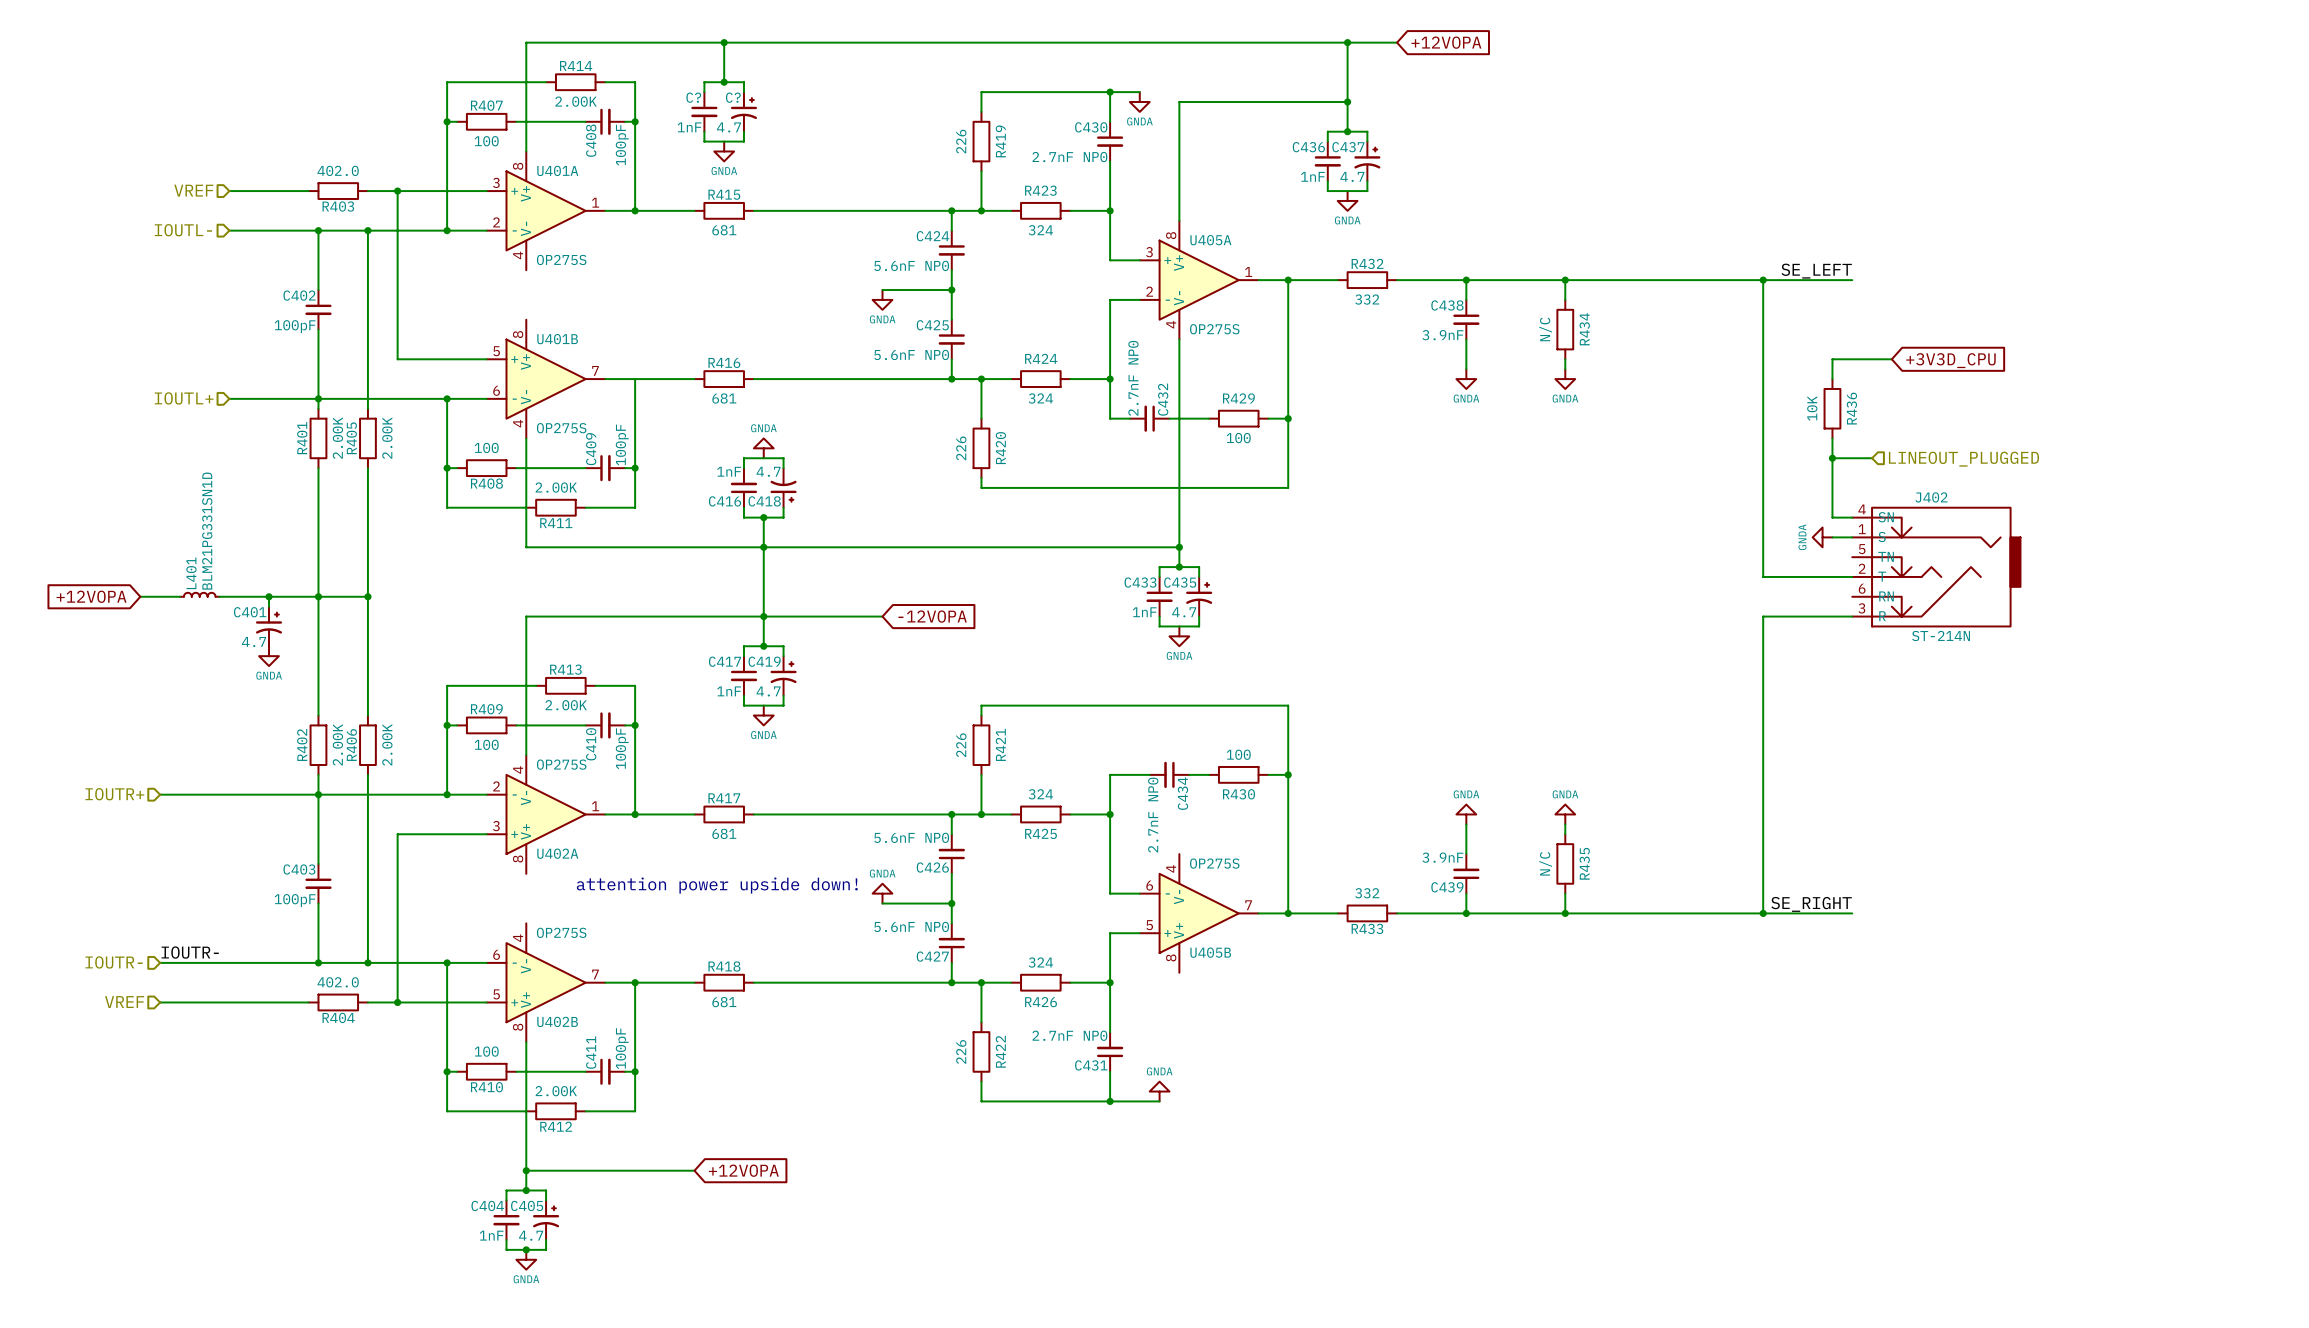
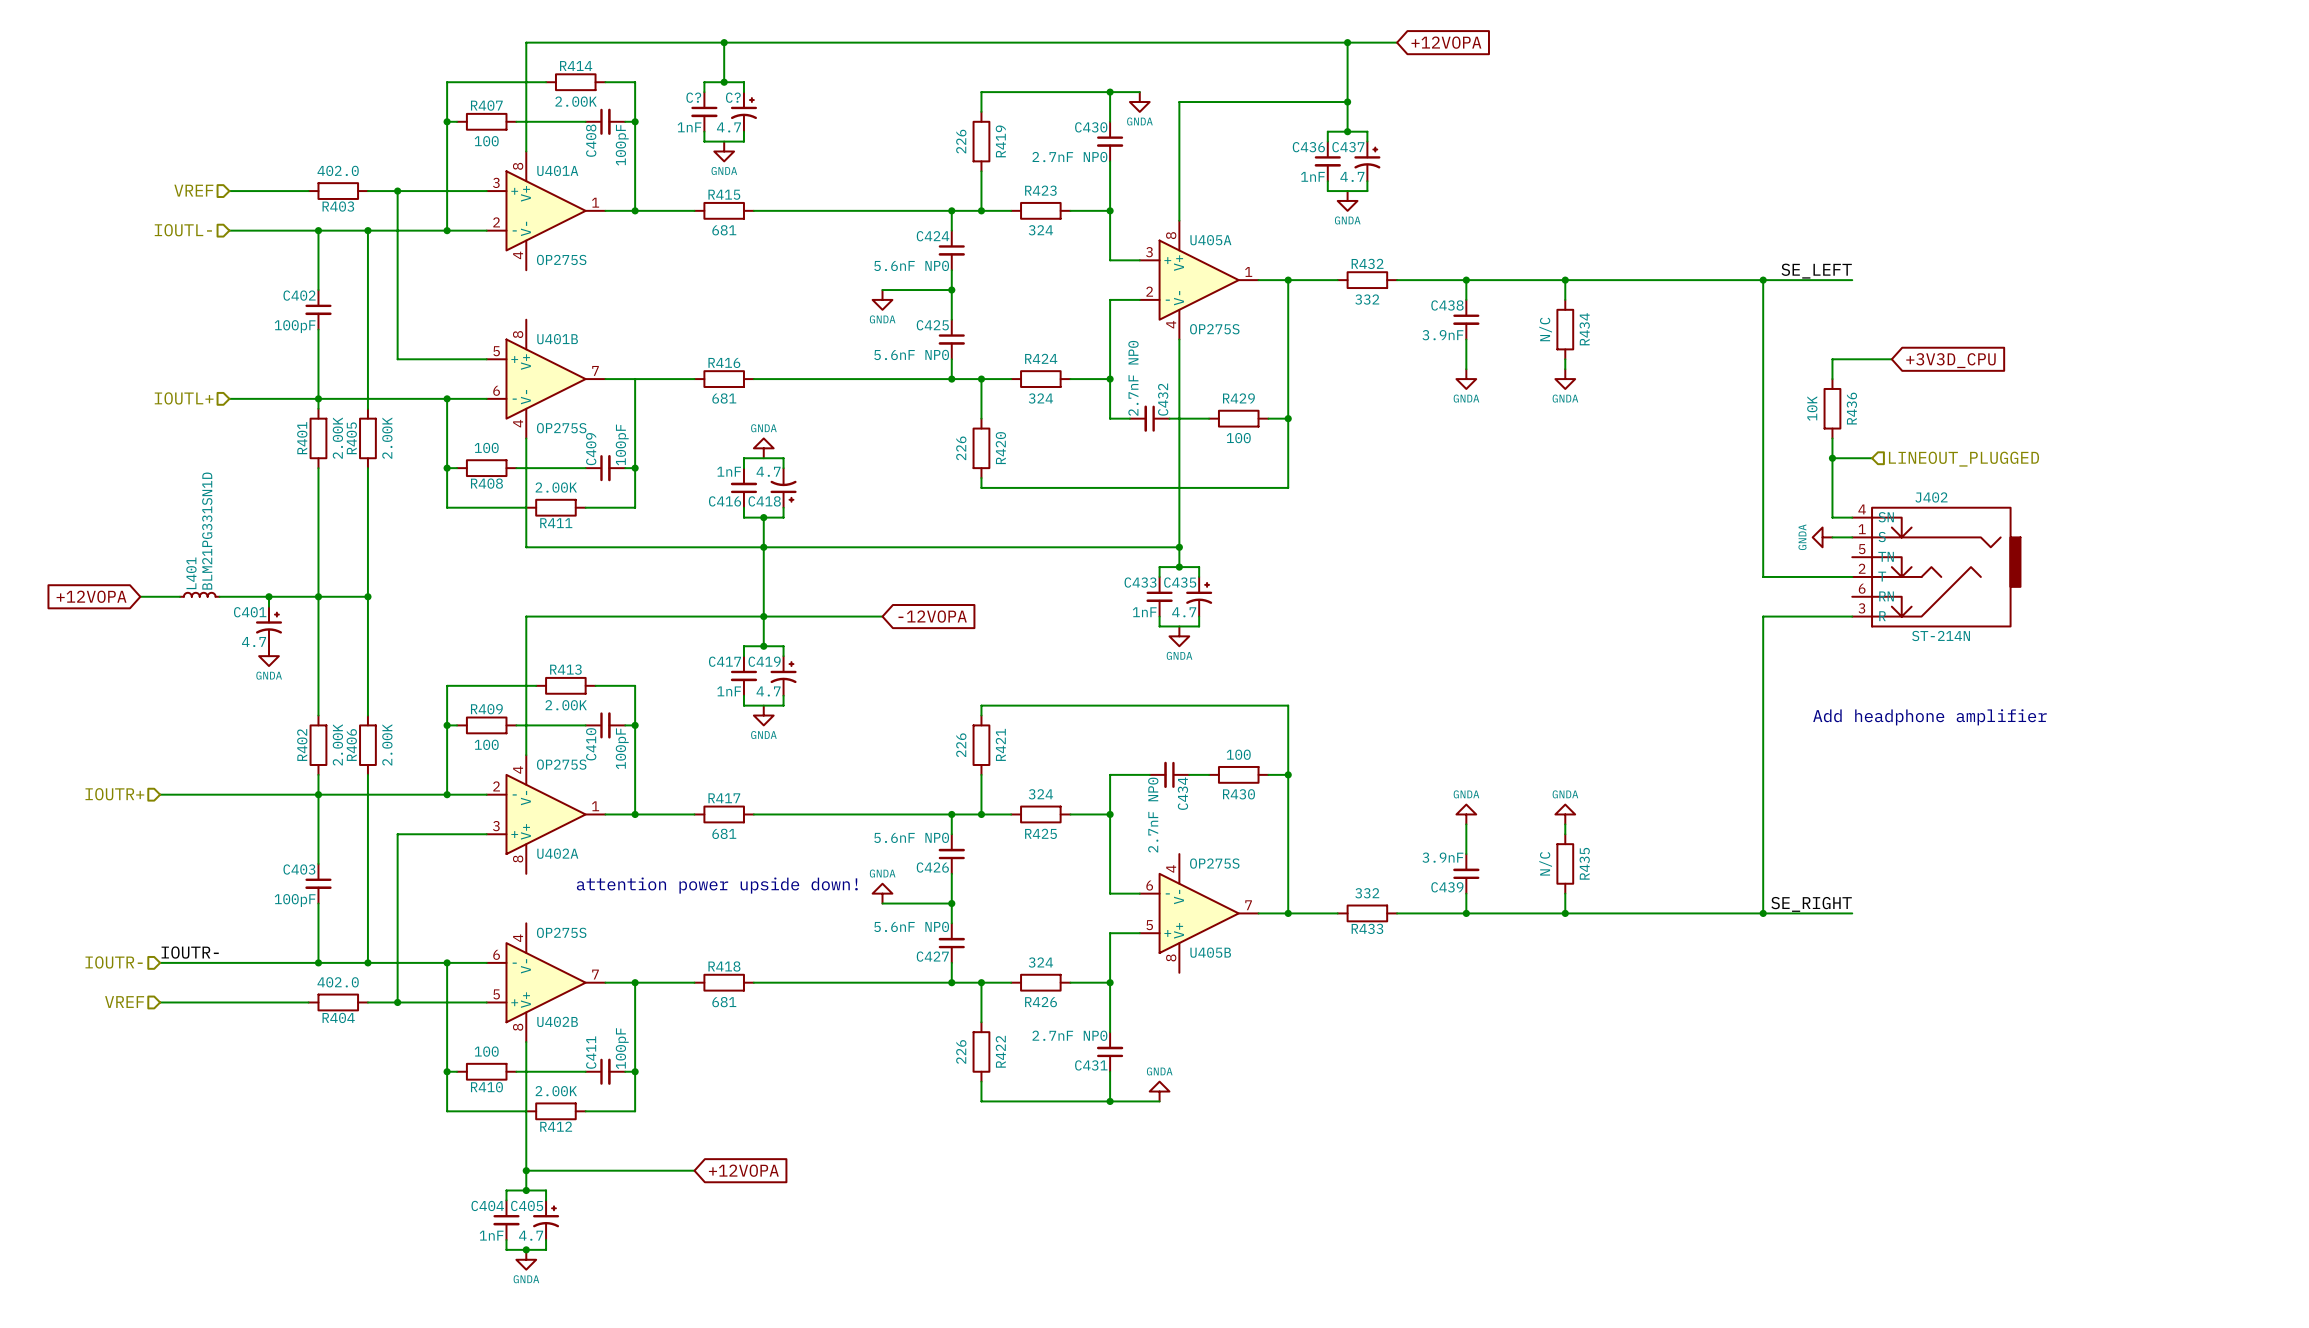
text: none -> Add headphone amplifier (1929, 717)

